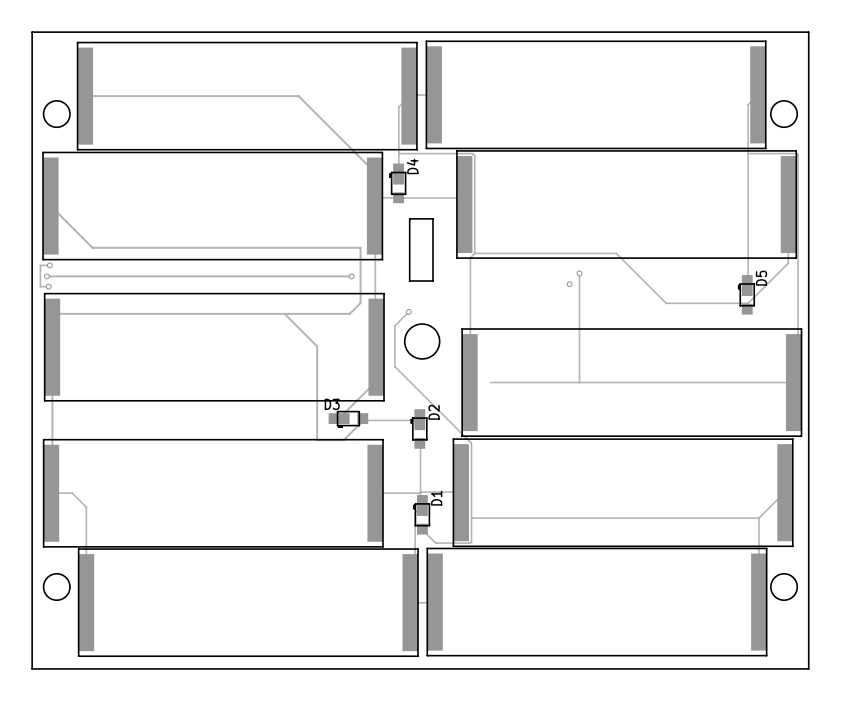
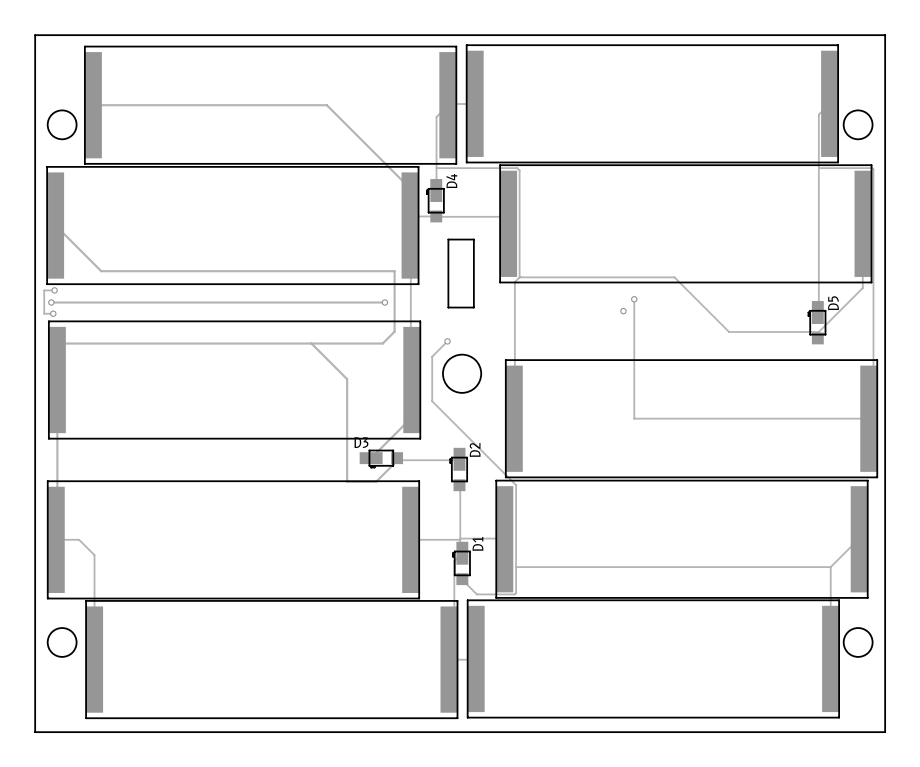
track: (490, 382) (579, 382) -> none

